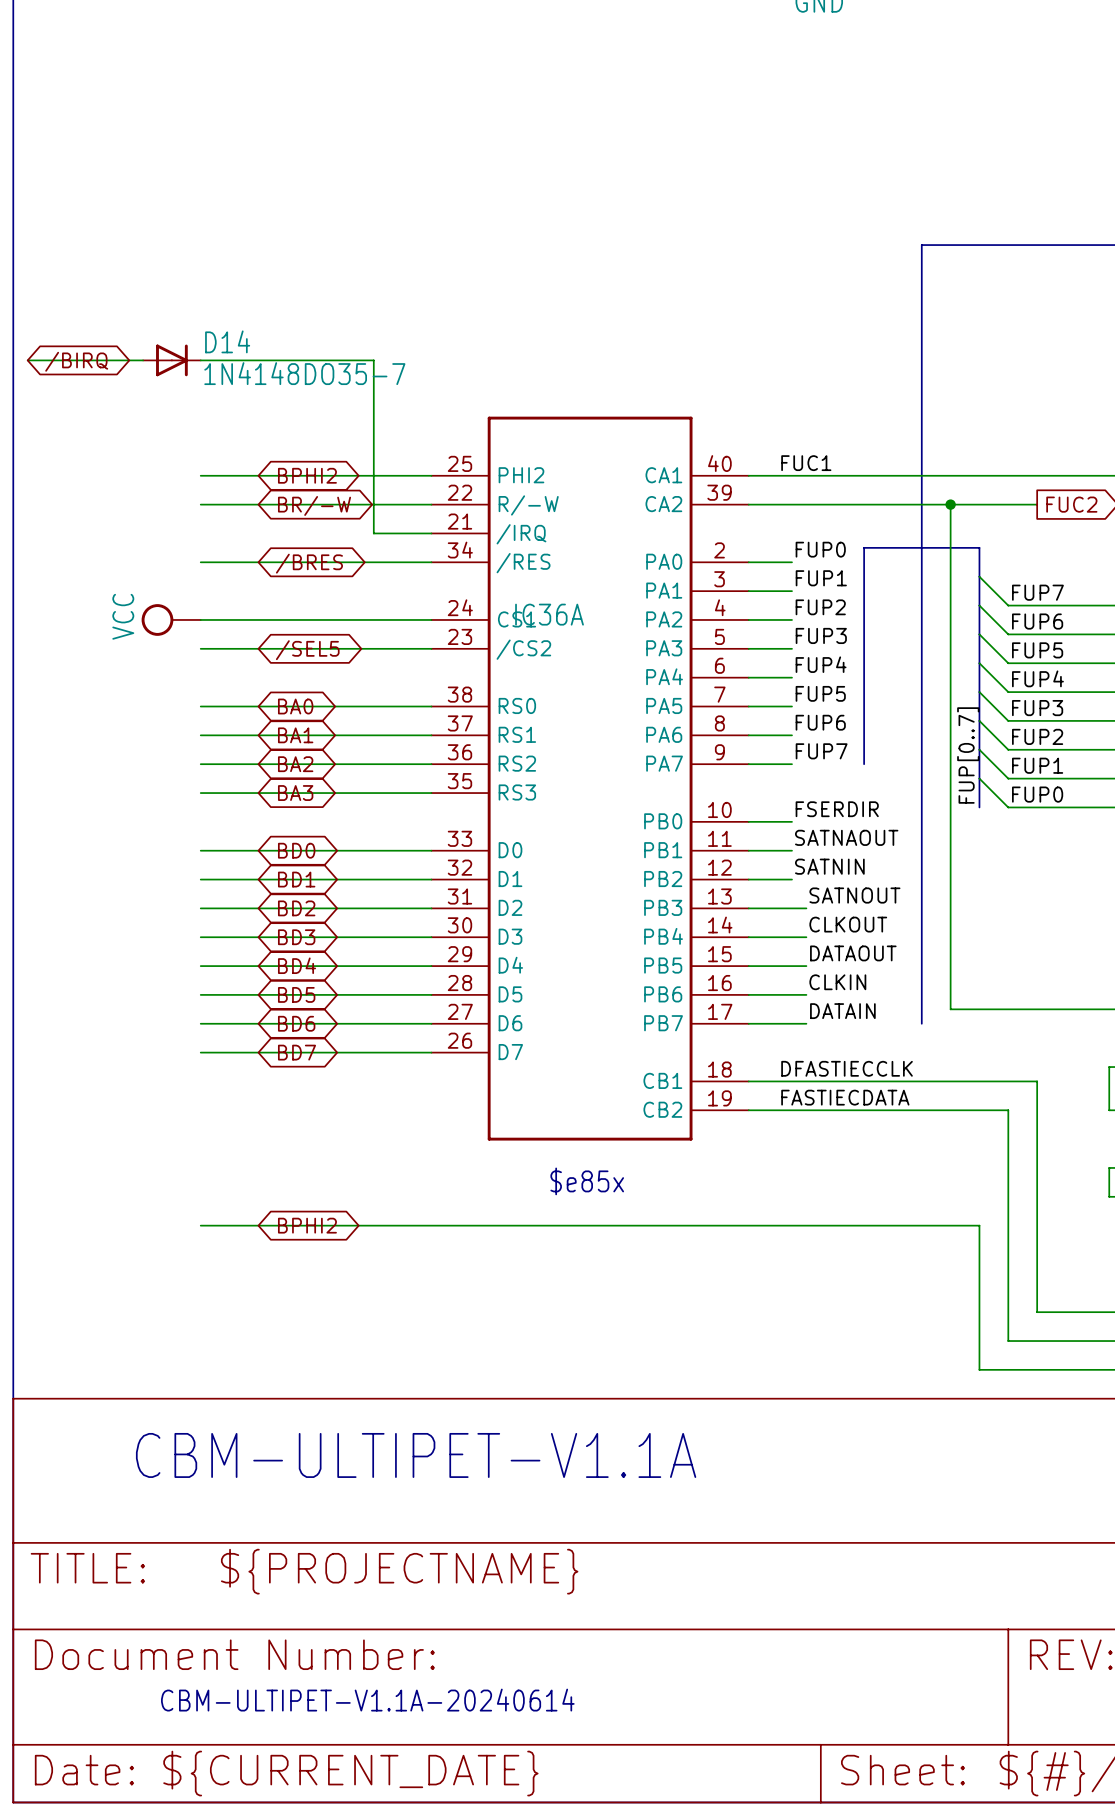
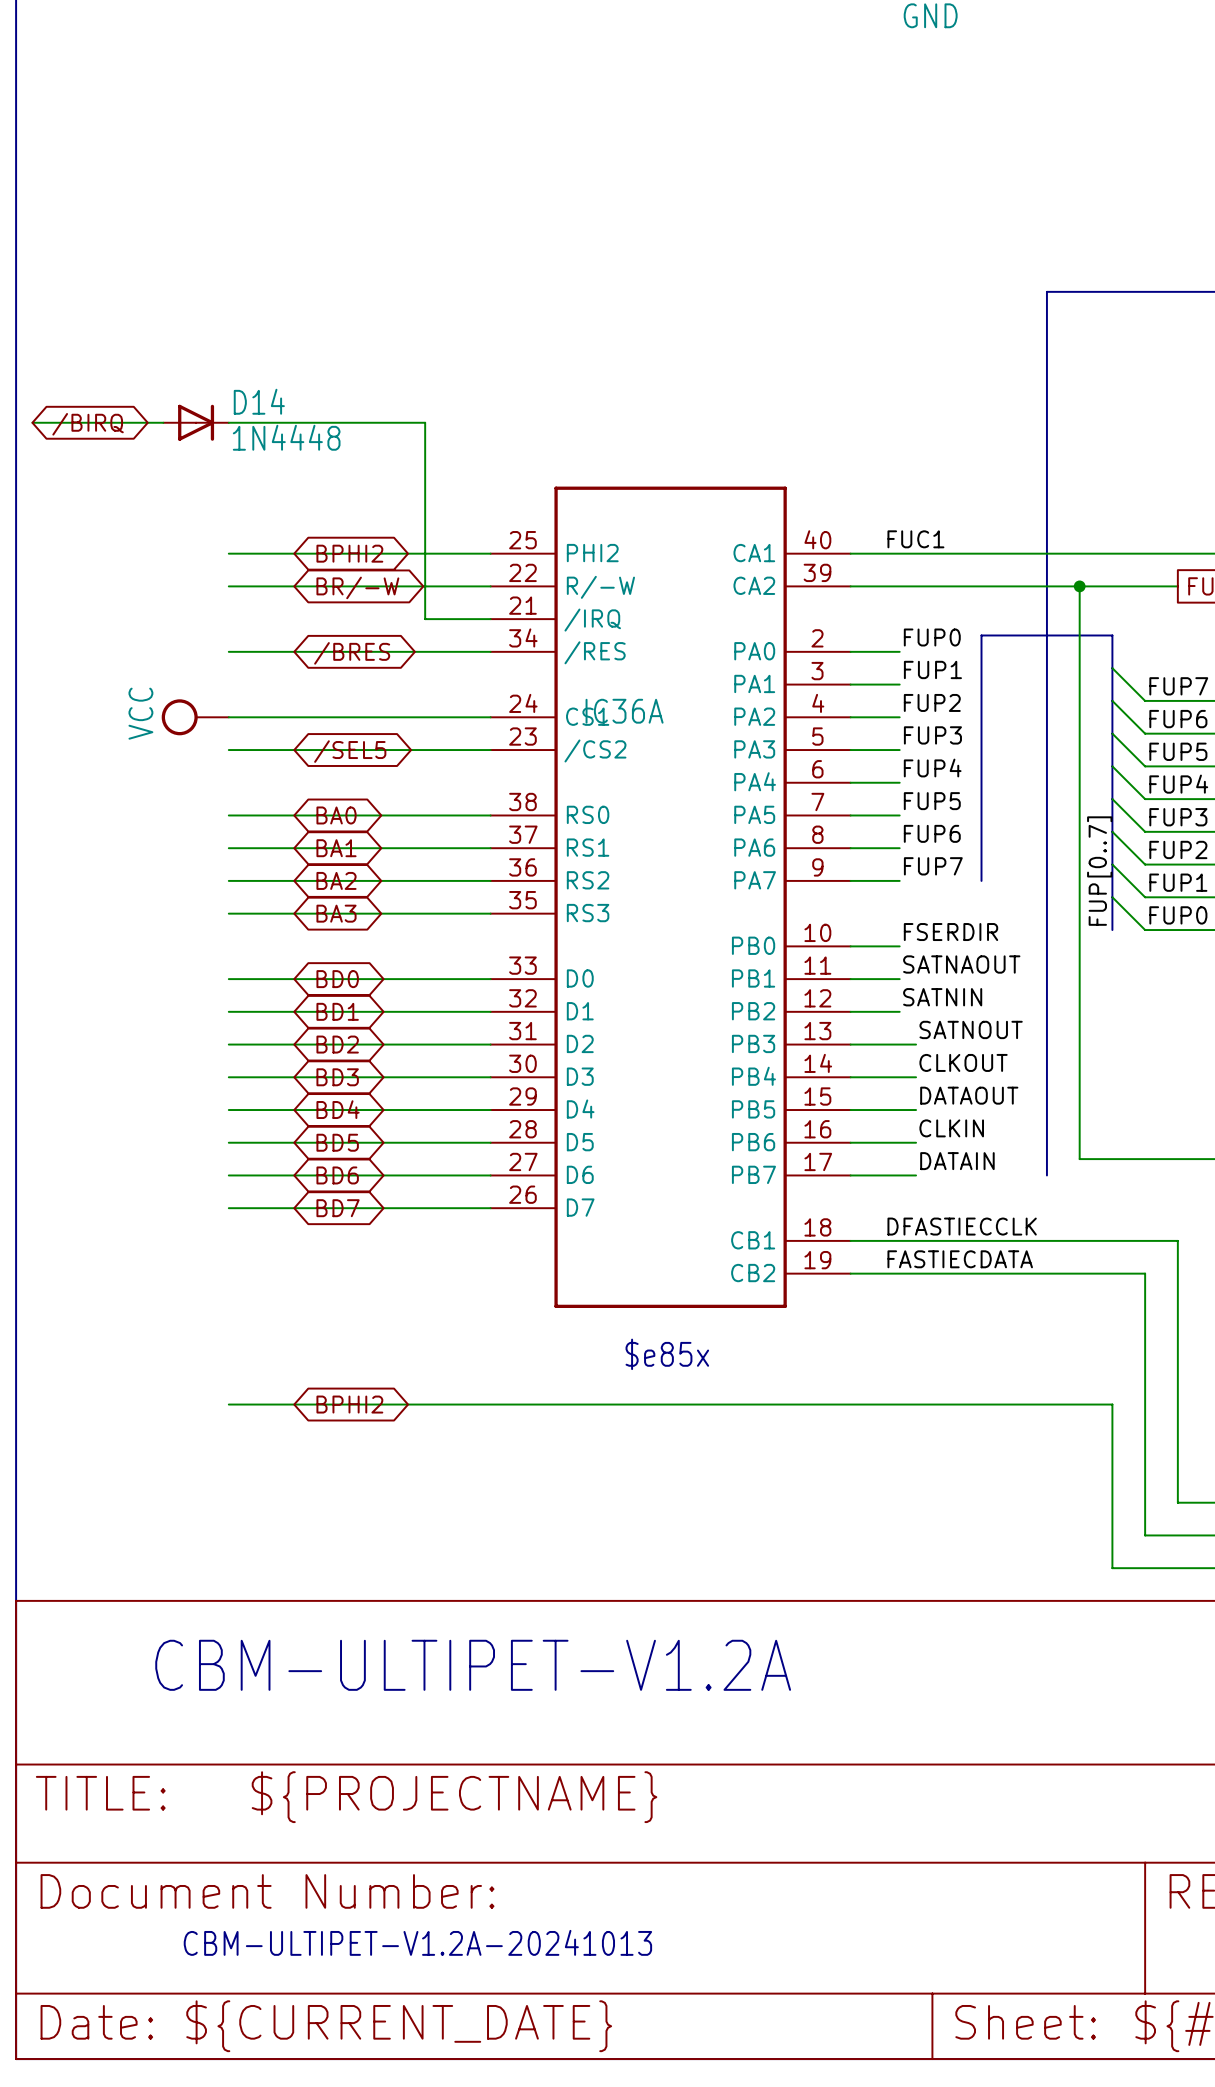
D14 value: 1N4148DO35-7 (304, 373) -> 1N4448 (286, 437)
text: CBM-ULTIPET-V1.1A (416, 1455) -> CBM-ULTIPET-V1.2A (473, 1665)
text: CBM-ULTIPET-V1.1A-20240614 (367, 1700) -> CBM-ULTIPET-V1.2A-20241013 (417, 1942)

